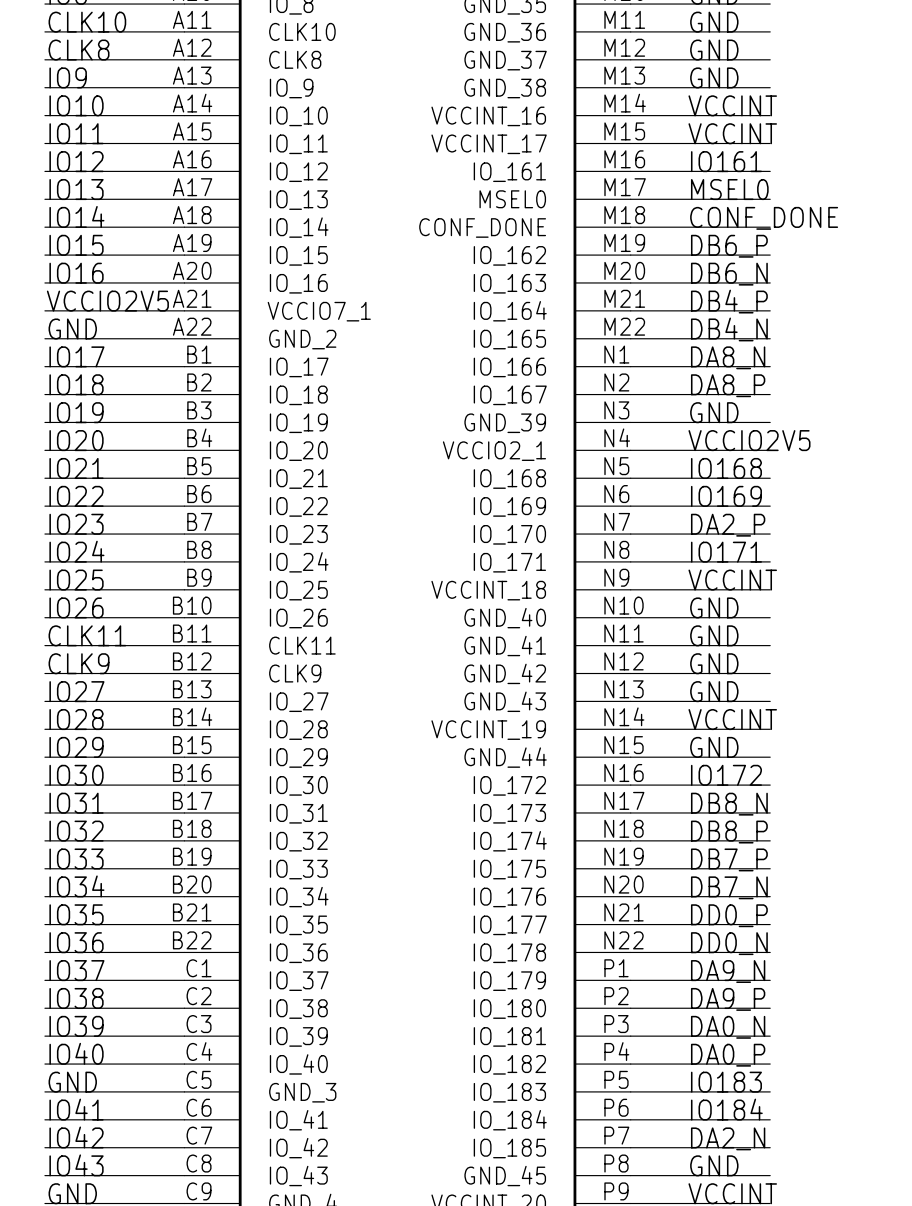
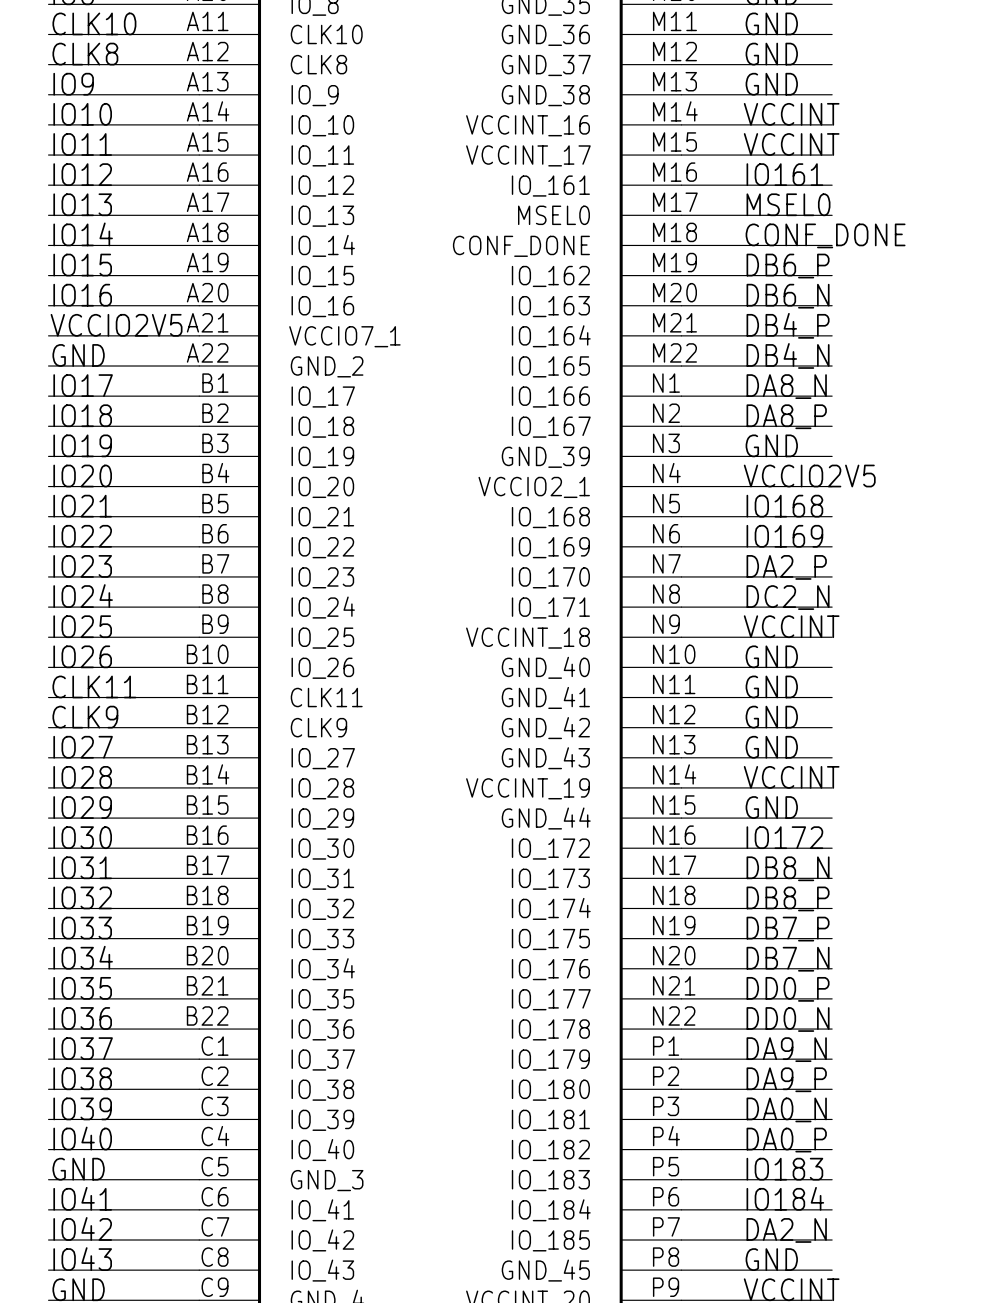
label: IO171 (726, 552) -> DC2_N (788, 597)

